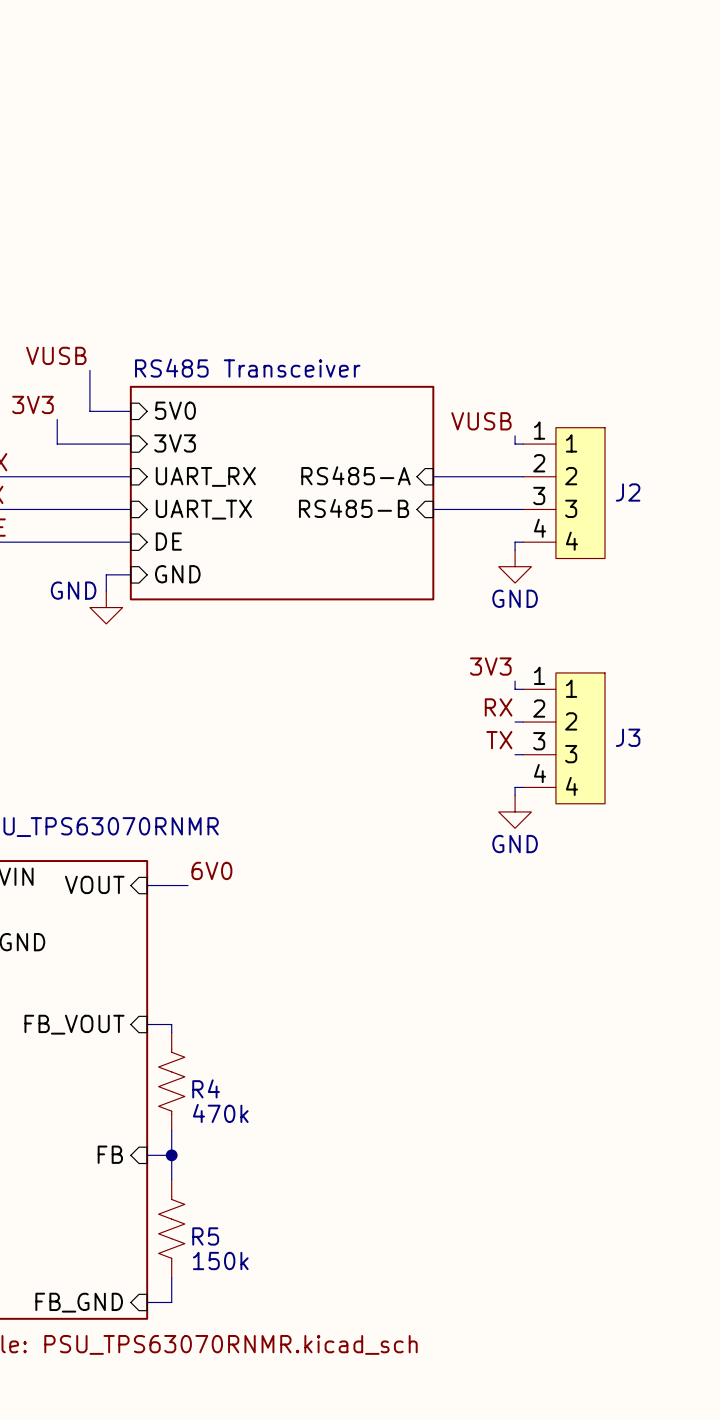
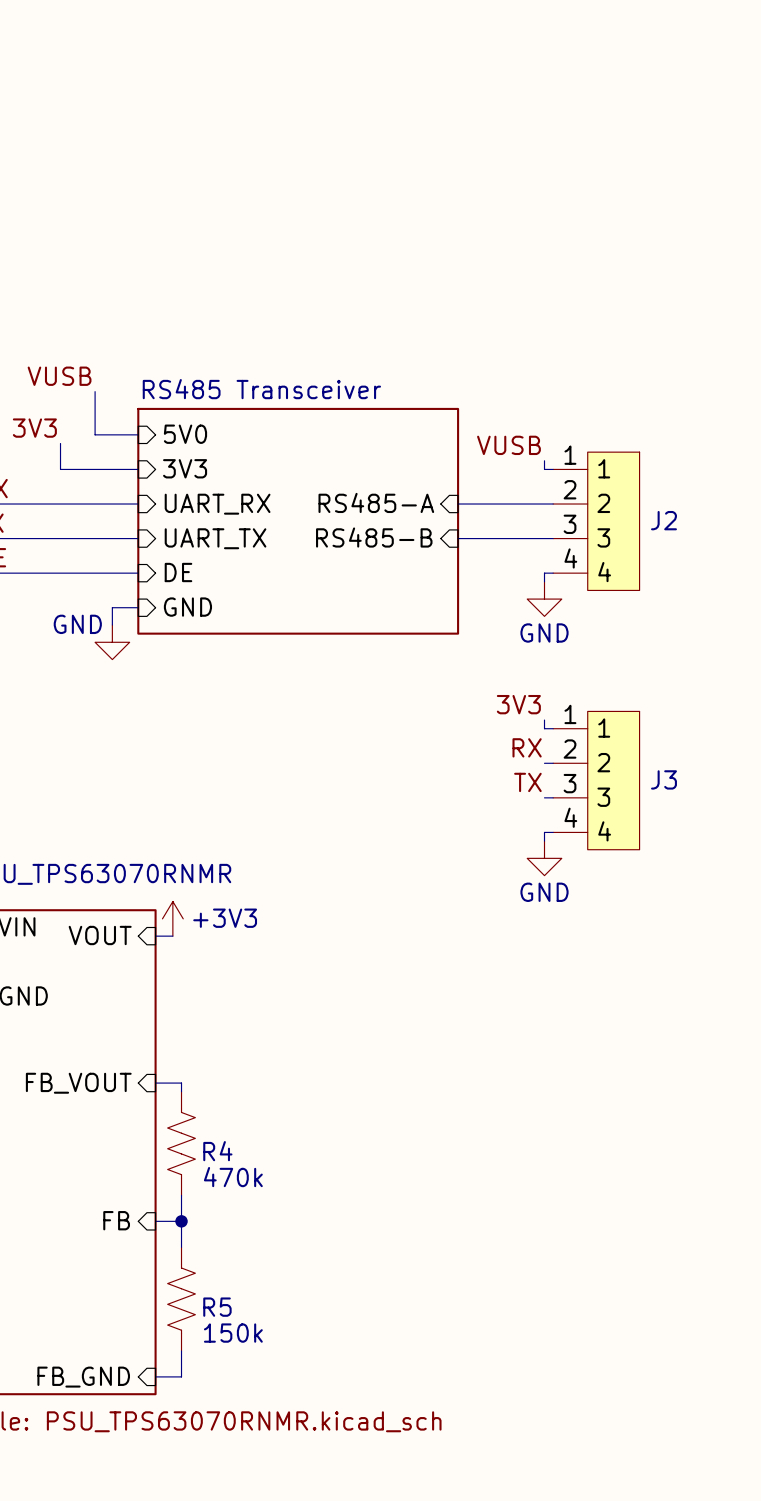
power symbol: none -> +3V3 (172, 918)
label: 6V0 (211, 870) -> none
wire: (163, 885) (188, 885) -> none

